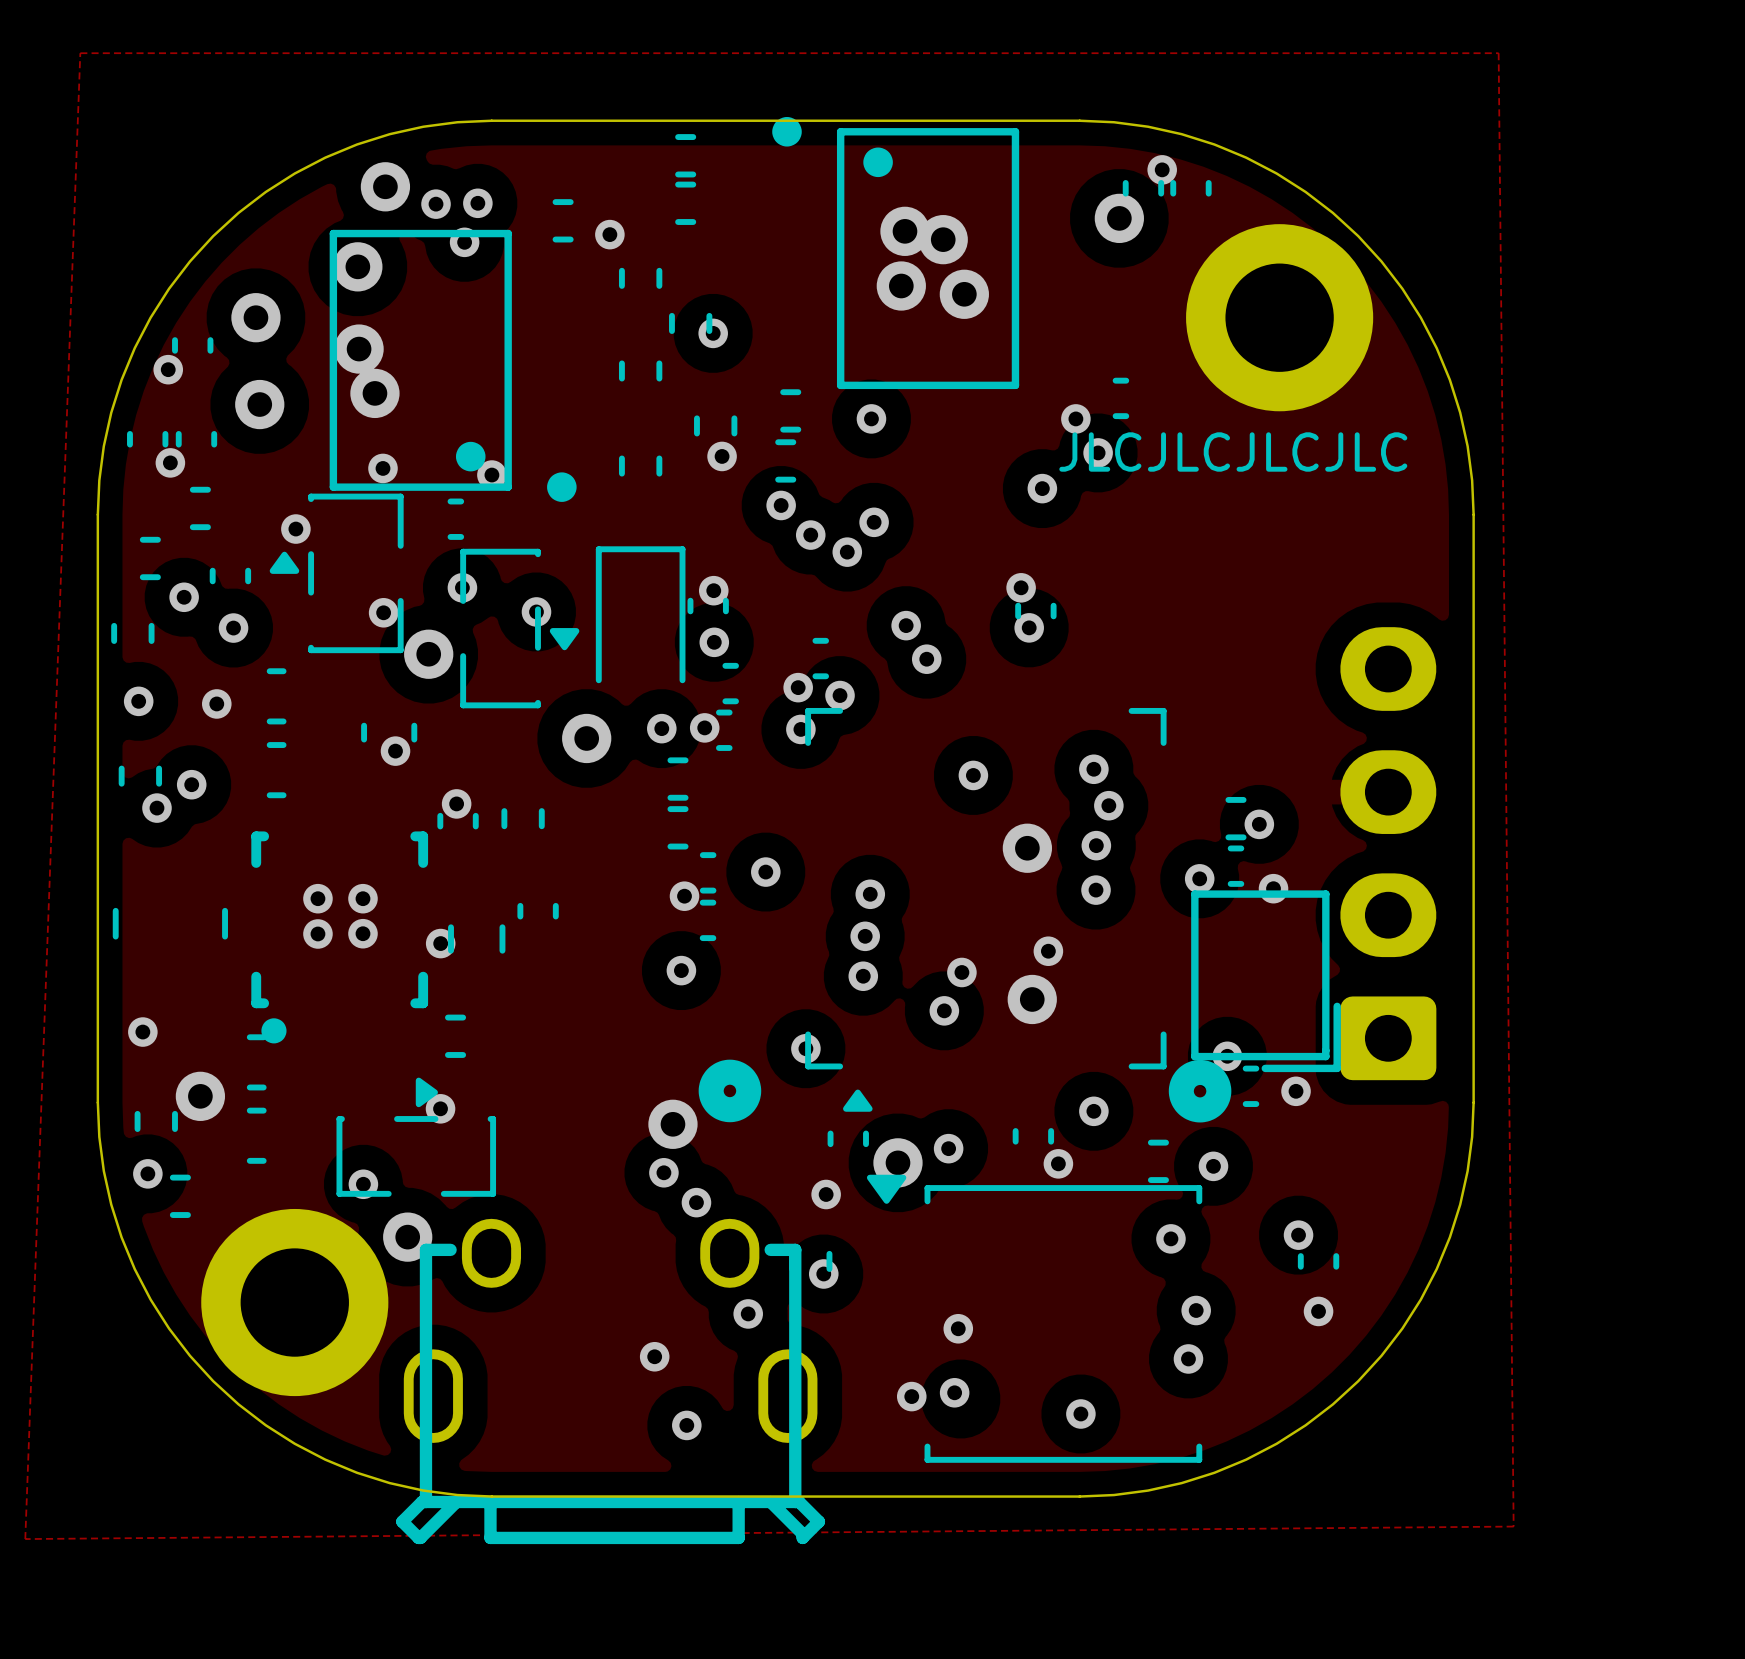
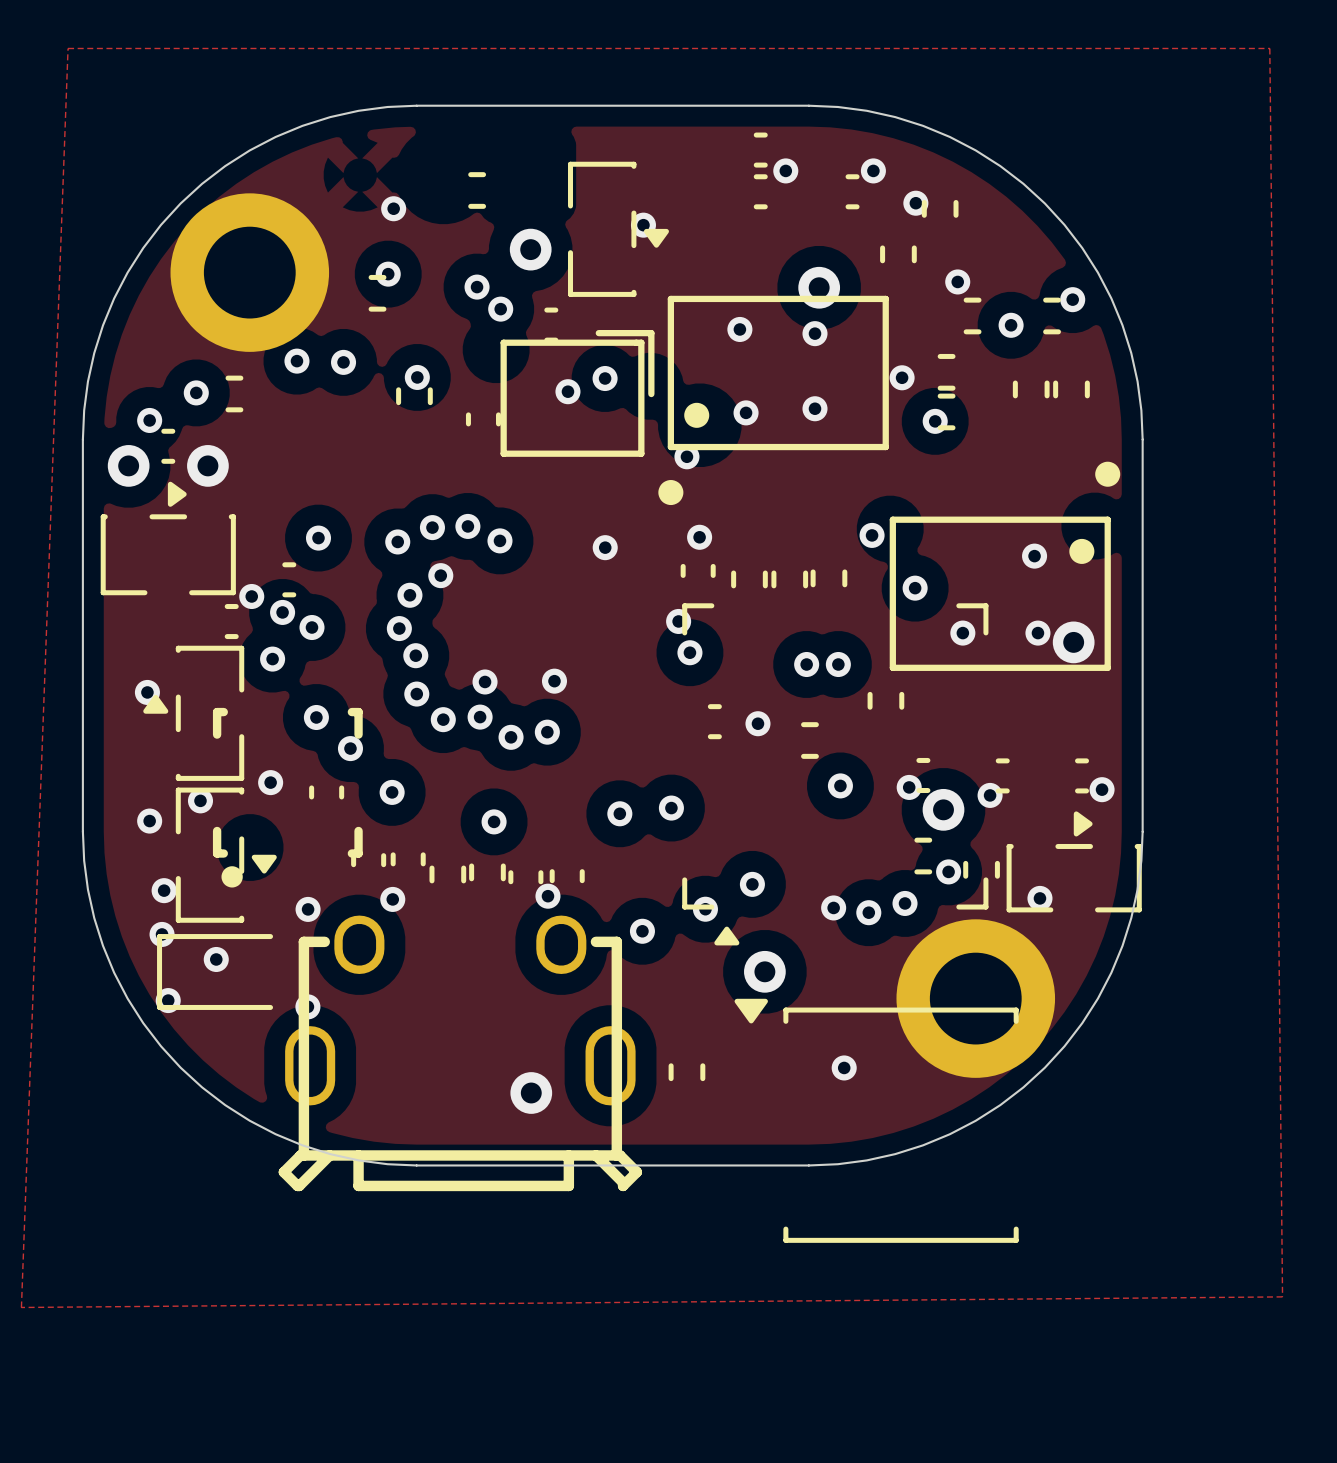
part footprint: [772, 117, 1020, 390] -> [753, 174, 768, 210]
board edge: (954, 120) (1079, 120) (1148, 126) (1214, 144) (1276, 173) (1332, 212) (1381, 261) (1420, 317) (1449, 379) (1467, 446) (1473, 514) (1472, 1136) (1460, 1204) (1436, 1269) (1402, 1328) (1358, 1381) (1305, 1425) (1246, 1459) (1181, 1483) (1114, 1495) (491, 1496) (423, 1490) (357, 1472) (294, 1443) (238, 1404) (189, 1355) (150, 1299) (121, 1237) (103, 1171) (97, 1102) (97, 977) -> (808, 105) (866, 110) (895, 117) (949, 136) (1000, 166) (1044, 203) (1082, 248) (1111, 298) (1131, 353) (1137, 381) (1142, 439) (1141, 860) (1131, 918) (1111, 972) (1082, 1023) (1044, 1067) (1000, 1105) (949, 1134) (895, 1154) (837, 1164) (416, 1165) (358, 1160) (330, 1154) (275, 1134) (225, 1105) (180, 1067) (143, 1023) (114, 972) (94, 918) (84, 860) (82, 831)
part: (685, 155) -> none
via: (1162, 169) -> none
part: none -> (760, 150)
via: (385, 186) -> none
part: (1143, 188) -> none
part: (1190, 188) -> none
via: none -> (873, 170)
via: (477, 203) -> none
part: (685, 203) -> none
via: (436, 204) -> none
via position: (1119, 218) -> (915, 203)
part: none -> (852, 191)
part footprint: [329, 229, 577, 502] -> [368, 274, 387, 312]
via position: (904, 231) -> (785, 170)
via: (609, 234) -> none
via: (943, 239) -> none
part: none -> (940, 208)
via: none -> (643, 225)
via: (357, 266) -> none
part: none -> (618, 229)
part: (640, 278) -> none
via: (901, 286) -> none
via: none -> (530, 249)
via position: (964, 294) -> (819, 287)
part: none -> (898, 254)
via: (255, 317) -> none
part: none -> (249, 272)
part: (1279, 317) -> none
via: none -> (388, 274)
part: (690, 323) -> none
via: none -> (957, 281)
via: (713, 333) -> none
via: none -> (477, 287)
part: (192, 345) -> none
via: (359, 349) -> none
via: none -> (1072, 299)
via: none -> (500, 309)
part footprint: [618, 360, 663, 382] -> [544, 307, 559, 343]
part: none -> (972, 315)
part: none -> (1052, 315)
via: (168, 369) -> none
via: none -> (1011, 325)
via: none -> (739, 329)
via: none -> (814, 333)
via: (374, 393) -> none
part: (1120, 398) -> none
via: (259, 404) -> none
part: (790, 410) -> none
via: (871, 418) -> none
via position: (1075, 418) -> (902, 377)
via: none -> (296, 361)
via: none -> (343, 362)
part: (715, 425) -> none
part: none -> (946, 372)
part: (147, 439) -> none
part: (196, 439) -> none
text: JLCJLCJLCJLC (1233, 451) -> none
via: (1098, 452) -> none
part: none -> (1031, 389)
part: none -> (1071, 389)
via position: (722, 456) -> (605, 378)
via: none -> (567, 391)
via: none -> (196, 392)
part: none -> (234, 393)
part: none -> (577, 393)
part: (785, 460) -> none
via position: (170, 462) -> (149, 420)
part: none -> (414, 396)
part: (640, 466) -> none
via: (383, 468) -> none
part: none -> (773, 400)
via position: (491, 475) -> (417, 377)
via: none -> (814, 408)
part: none -> (946, 411)
via: none -> (746, 412)
part footprint: [189, 486, 211, 531] -> [161, 428, 176, 464]
via: (1042, 488) -> none
part: none -> (483, 419)
via: none -> (935, 421)
via: (781, 505) -> none
part: (455, 519) -> none
via: (874, 522) -> none
via: (295, 529) -> none
via: none -> (128, 465)
via: none -> (207, 465)
via: (847, 552) -> none
part: (150, 558) -> none
part rotation: 0° (336, 573) -> 90° clockwise (168, 538)
part position: (336, 573) -> (168, 538)
part: (230, 576) -> none
via: (462, 587) -> none
via: (1021, 587) -> none
via: (713, 590) -> none
via: (184, 597) -> none
part: (708, 606) -> none
via: (536, 611) -> none
part: (1035, 611) -> none
via position: (383, 612) -> (318, 538)
part: (640, 614) -> none
via: none -> (467, 526)
via: none -> (432, 527)
via: (906, 625) -> none
via: (233, 628) -> none
part: (519, 628) -> none
via: none -> (699, 537)
part: (132, 633) -> none
via: none -> (499, 540)
via: none -> (397, 541)
via: none -> (1034, 556)
via: (428, 654) -> none
part rotation: 0° (820, 658) -> 90° clockwise (698, 570)
via: (926, 659) -> none
part: none -> (1004, 566)
via: none -> (440, 575)
part: none -> (828, 578)
part: none -> (749, 579)
part: none -> (789, 579)
part: none -> (289, 579)
part: (730, 683) -> none
via: (798, 687) -> none
via: none -> (915, 588)
via: (840, 695) -> none
part: (276, 696) -> none
via: none -> (409, 595)
via: none -> (251, 596)
via: (138, 701) -> none
via: (216, 703) -> none
via: none -> (282, 612)
via: (704, 727) -> none
via: (661, 728) -> none
part: none -> (231, 621)
part: (724, 730) -> none
part: (389, 732) -> none
via: none -> (399, 628)
via: (586, 738) -> none
via: none -> (962, 633)
via: none -> (1037, 633)
via position: (395, 751) -> (311, 627)
via: none -> (1073, 642)
via: none -> (689, 652)
via: none -> (415, 655)
via: (1093, 769) -> none
part: (276, 770) -> none
via: none -> (272, 659)
via: (973, 775) -> none
part: (140, 776) -> none
part: (678, 779) -> none
via: none -> (806, 664)
via: none -> (838, 664)
via: (191, 784) -> none
via: none -> (554, 681)
via: none -> (485, 681)
via: (456, 803) -> none
via: (1108, 805) -> none
via: (156, 808) -> none
via: none -> (147, 692)
via: none -> (416, 694)
part: (523, 818) -> none
part: (1235, 818) -> none
part: (458, 821) -> none
part: none -> (885, 700)
via: (1259, 824) -> none
part: (678, 827) -> none
part: none -> (193, 713)
via: none -> (316, 717)
via: none -> (480, 717)
via: none -> (443, 719)
via: (1096, 845) -> none
part: none -> (714, 721)
via: (1027, 848) -> none
via: none -> (757, 723)
part: (1388, 853) -> none
via: none -> (547, 732)
via: none -> (511, 737)
part: (1235, 866) -> none
part: none -> (809, 740)
part: (708, 872) -> none
via: (765, 872) -> none
via: (1199, 878) -> none
via: none -> (350, 748)
via position: (1273, 888) -> (1102, 789)
via: (1096, 890) -> none
part footprint: [1191, 890, 1341, 1073] -> [1006, 811, 1142, 913]
via: (870, 894) -> none
via: (684, 896) -> none
via: (317, 898) -> none
via: (362, 898) -> none
part: (538, 911) -> none
part: none -> (923, 775)
part: none -> (1002, 775)
part: none -> (1082, 775)
via: none -> (270, 782)
part: (708, 920) -> none
part: (170, 923) -> none
via: none -> (840, 785)
part: none -> (326, 792)
via: (317, 933) -> none
via: (362, 933) -> none
via: none -> (990, 795)
via: (865, 936) -> none
part: (476, 938) -> none
via: none -> (200, 800)
via position: (440, 943) -> (392, 792)
via: none -> (671, 808)
via position: (1048, 951) -> (909, 787)
via: none -> (943, 809)
via: none -> (619, 813)
via: none -> (149, 821)
via: none -> (494, 821)
via: (681, 970) -> none
via: (961, 972) -> none
via: (863, 976) -> none
via: (1032, 999) -> none
part: none -> (226, 855)
part: none -> (923, 856)
part: none -> (408, 859)
via: (944, 1010) -> none
part: none -> (368, 860)
part: none -> (981, 869)
part: none -> (487, 872)
via: none -> (948, 871)
part: none -> (447, 874)
part: none -> (567, 876)
part: none -> (525, 877)
via: (142, 1032) -> none
part: (455, 1036) -> none
via: none -> (752, 884)
via: none -> (164, 890)
via position: (805, 1048) -> (705, 909)
via: none -> (547, 896)
via: none -> (392, 899)
part: (256, 1062) -> none
via: none -> (905, 903)
via: none -> (833, 907)
via: none -> (308, 909)
via size: [175, 1071, 226, 1121] -> [149, 921, 175, 947]
via: none -> (868, 912)
part: (1251, 1086) -> none
part: (729, 1090) -> none
part: (1200, 1091) -> none
via: (1296, 1091) -> none
via: none -> (642, 931)
part footprint: [246, 1107, 267, 1164] -> [157, 934, 274, 1010]
via: (440, 1108) -> none
via: (1093, 1111) -> none
part: (156, 1121) -> none
via: (672, 1124) -> none
via: none -> (216, 959)
part: (1033, 1136) -> none
part: (416, 1137) -> none
part: (848, 1138) -> none
part footprint: [1147, 1139, 1169, 1184] -> [896, 919, 1056, 1078]
via: (948, 1148) -> none
via position: (897, 1162) -> (764, 971)
via: (1058, 1163) -> none
via: (1213, 1166) -> none
via: (663, 1172) -> none
via: (147, 1173) -> none
via: none -> (168, 1000)
via: (826, 1194) -> none
part: (180, 1196) -> none
via: (696, 1202) -> none
via: (1298, 1235) -> none
via: (407, 1237) -> none
via: (1170, 1238) -> none
via: none -> (844, 1067)
part: (1318, 1261) -> none
via: (823, 1273) -> none
via: none -> (531, 1092)
part: (294, 1302) -> none
via: (1196, 1310) -> none
via: (1318, 1311) -> none
via: (748, 1313) -> none
via: (958, 1328) -> none
via: (654, 1356) -> none
via: (1188, 1358) -> none
part position: (610, 1381) -> (460, 1053)
via: (954, 1392) -> none
via: (911, 1396) -> none
via: (1080, 1413) -> none
via: (686, 1425) -> none

